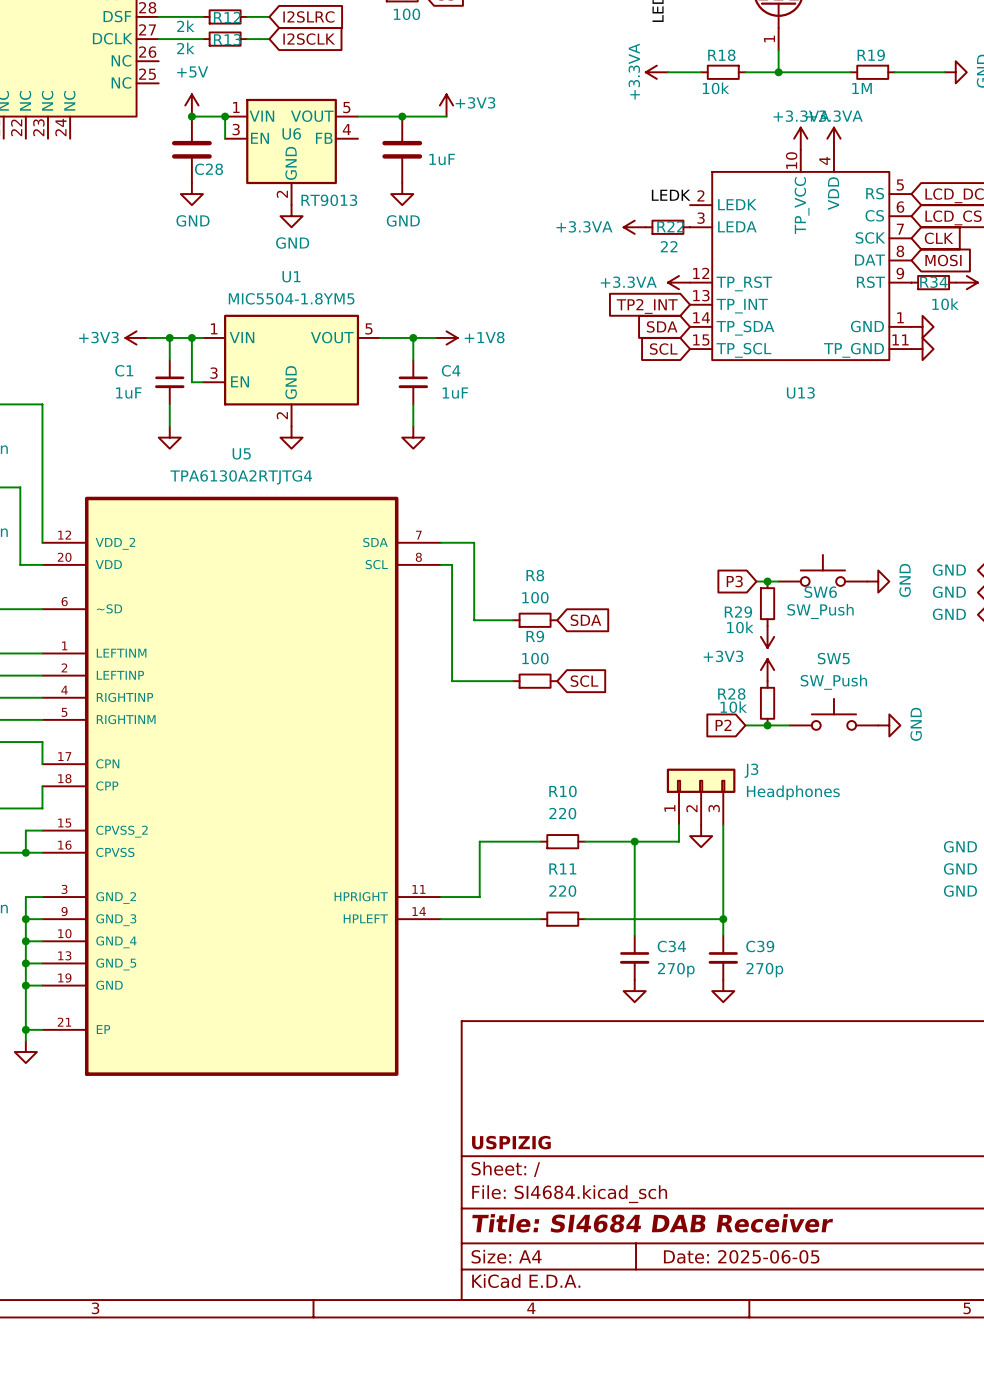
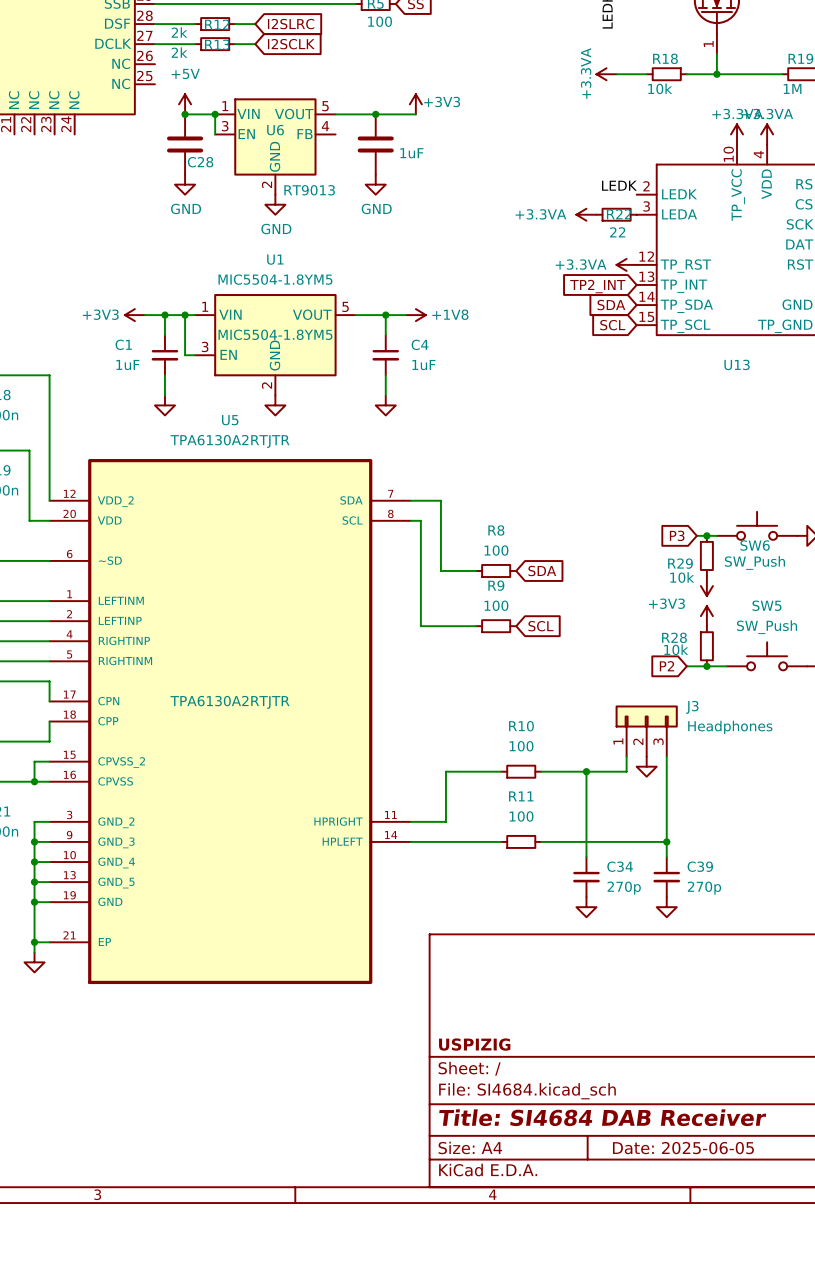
U1 text: none -> MIC5504-1.8YM5 (275, 334)
U5 value: TPA6130A2RTJTG4 (241, 477) -> TPA6130A2RTJTR (230, 441)
U5 text: none -> TPA6130A2RTJTR (230, 702)
R10 value: 220 (562, 813) -> 100 (521, 746)
R11 value: 220 (562, 891) -> 100 (521, 816)

